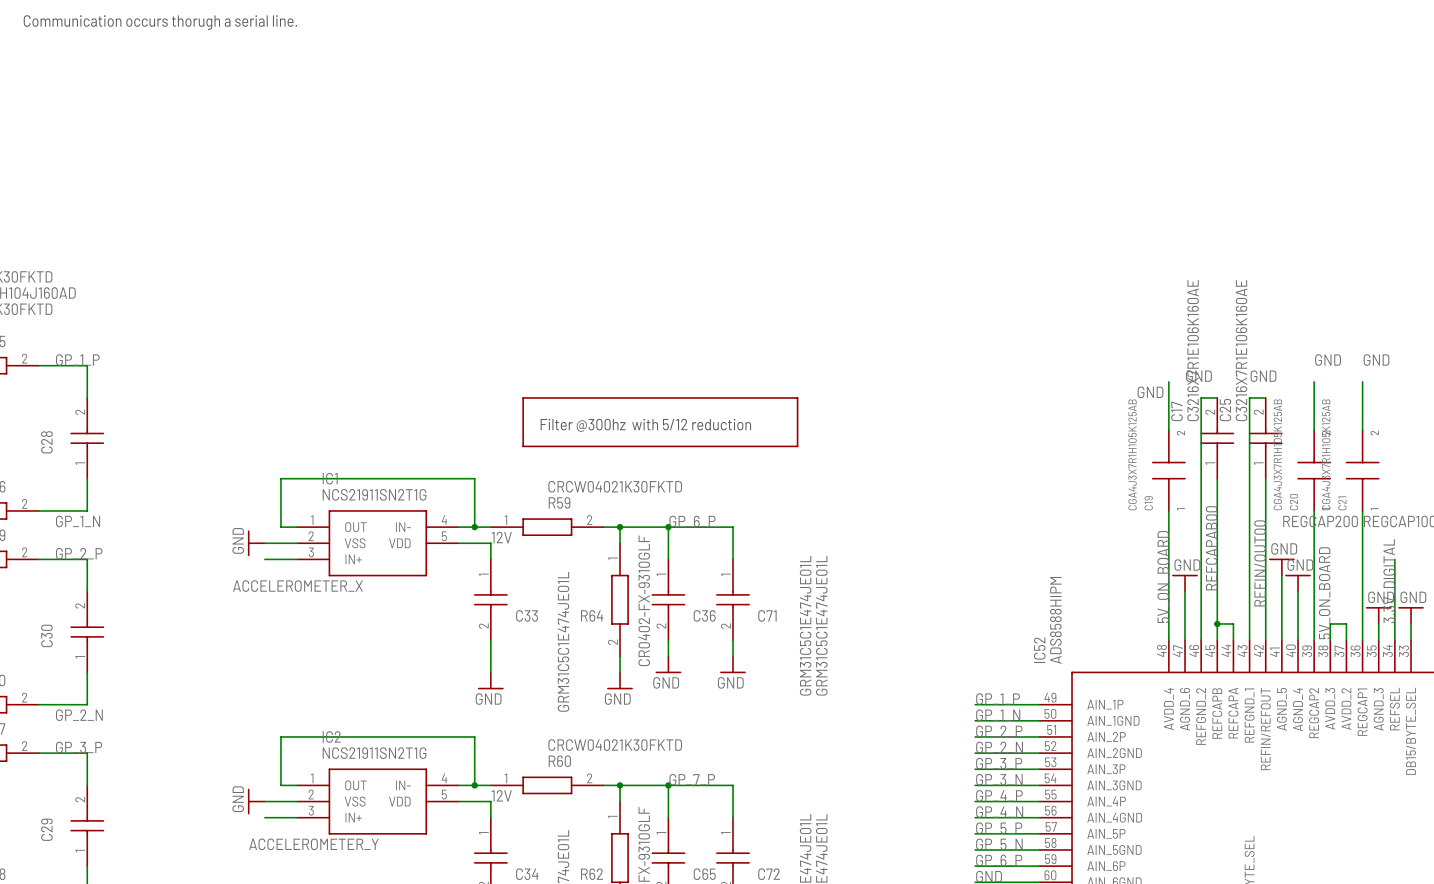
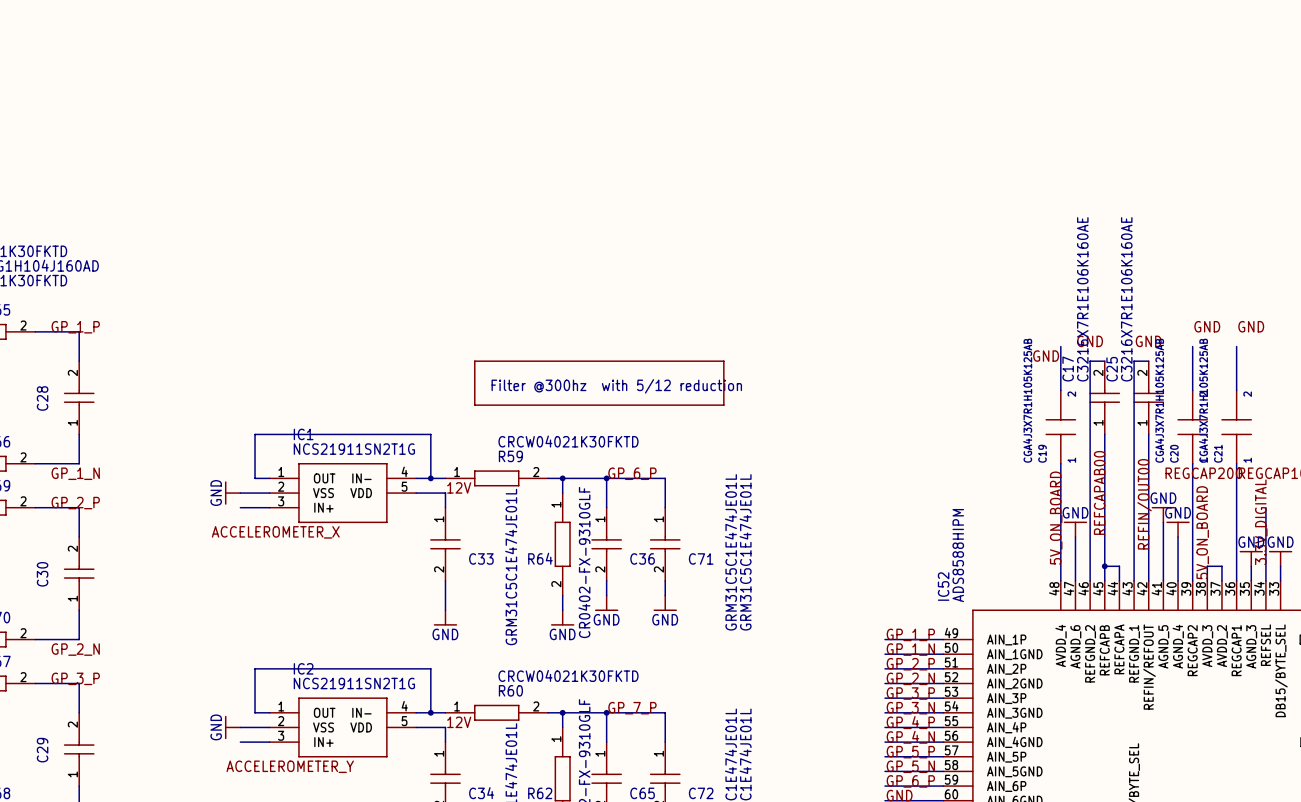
text: Communication occurs thorugh a serial line. (160, 22) -> none

